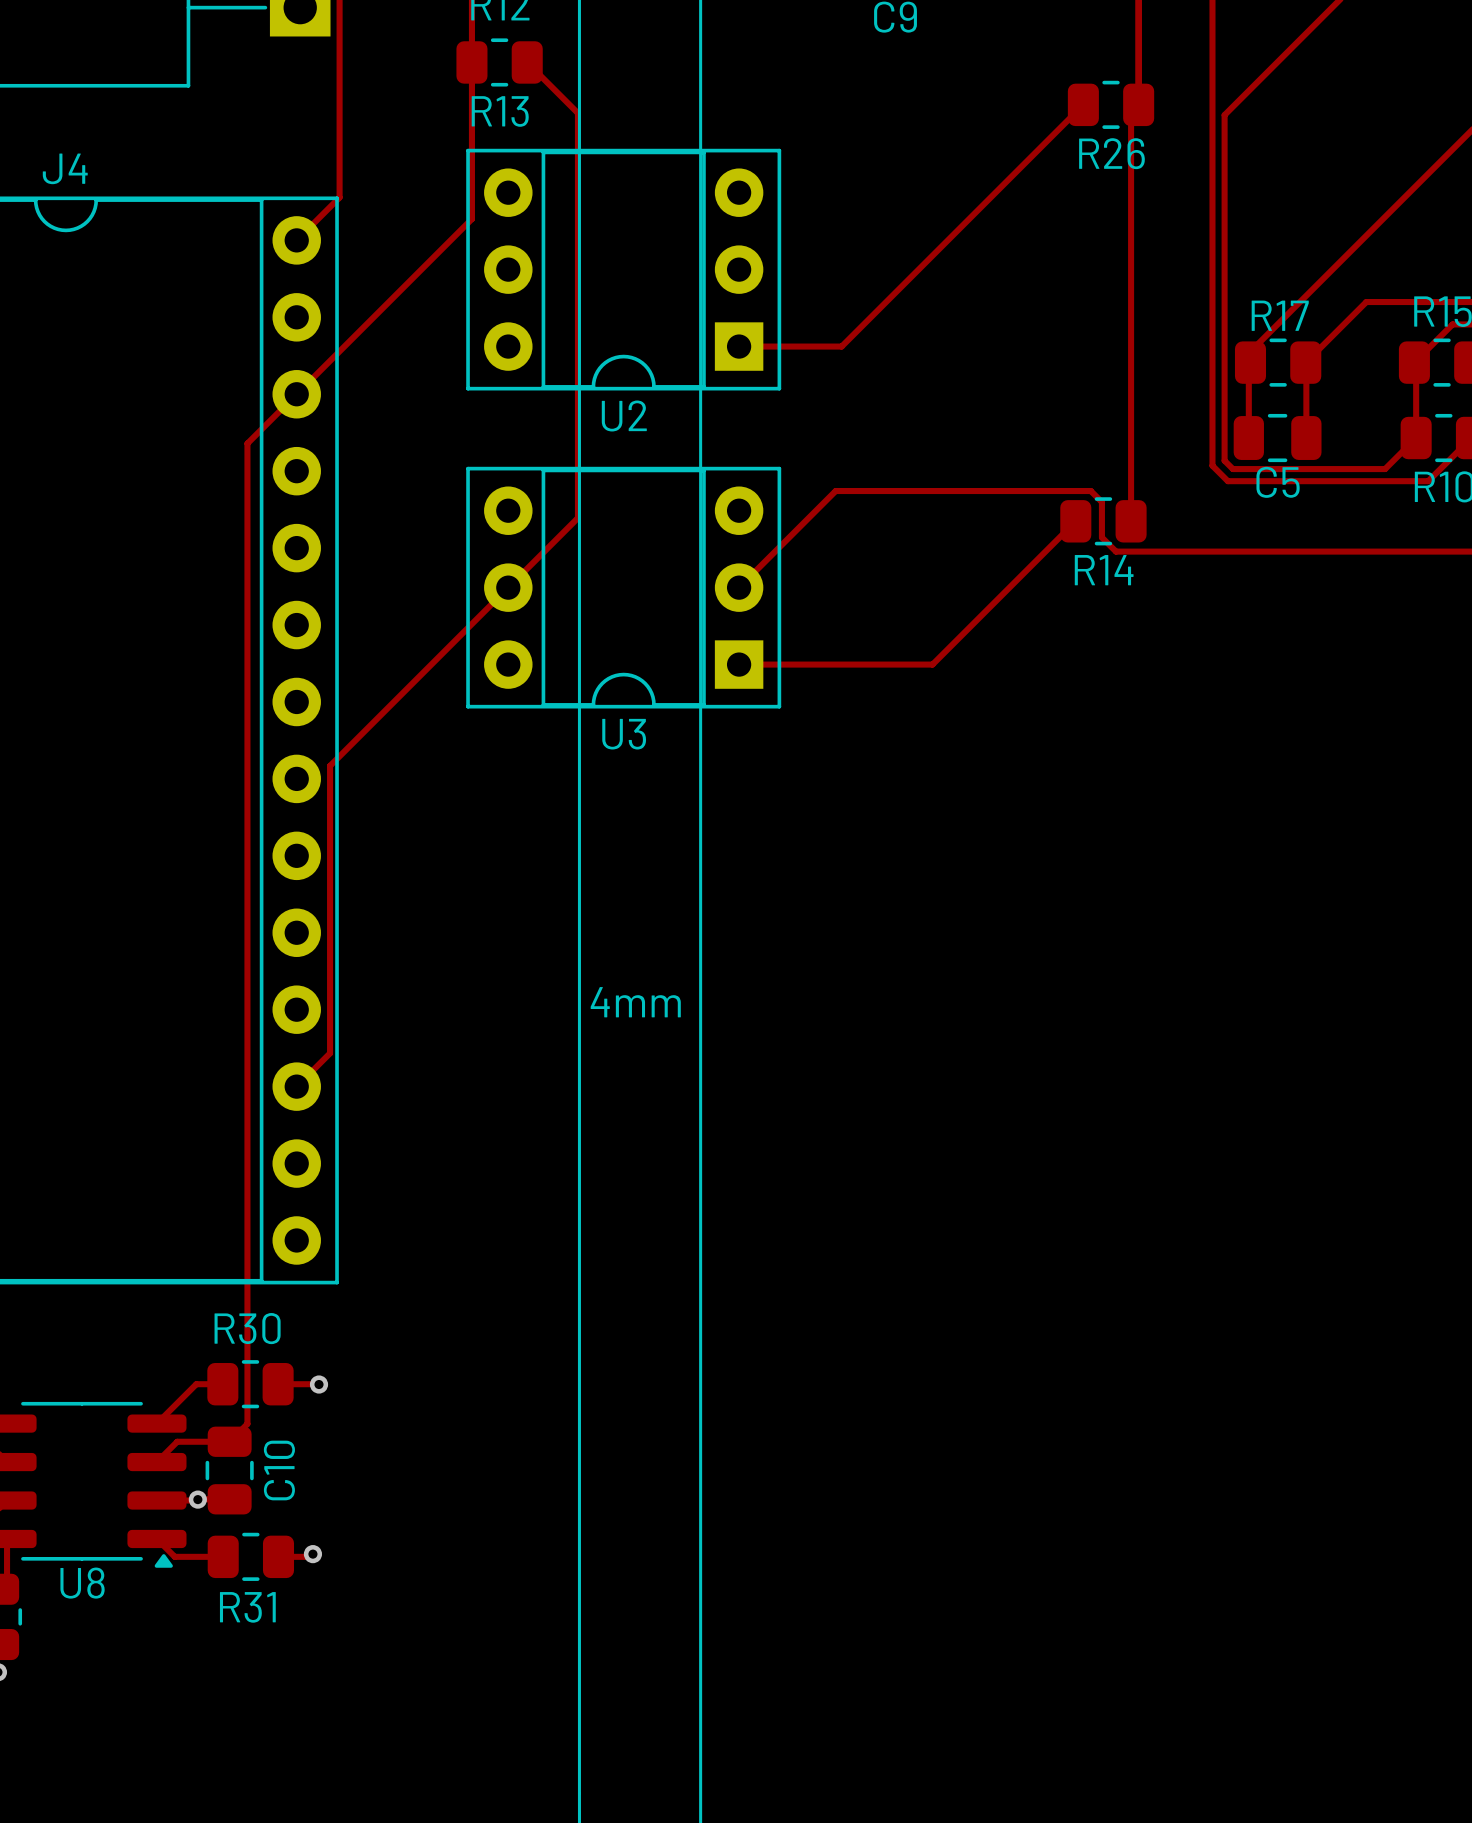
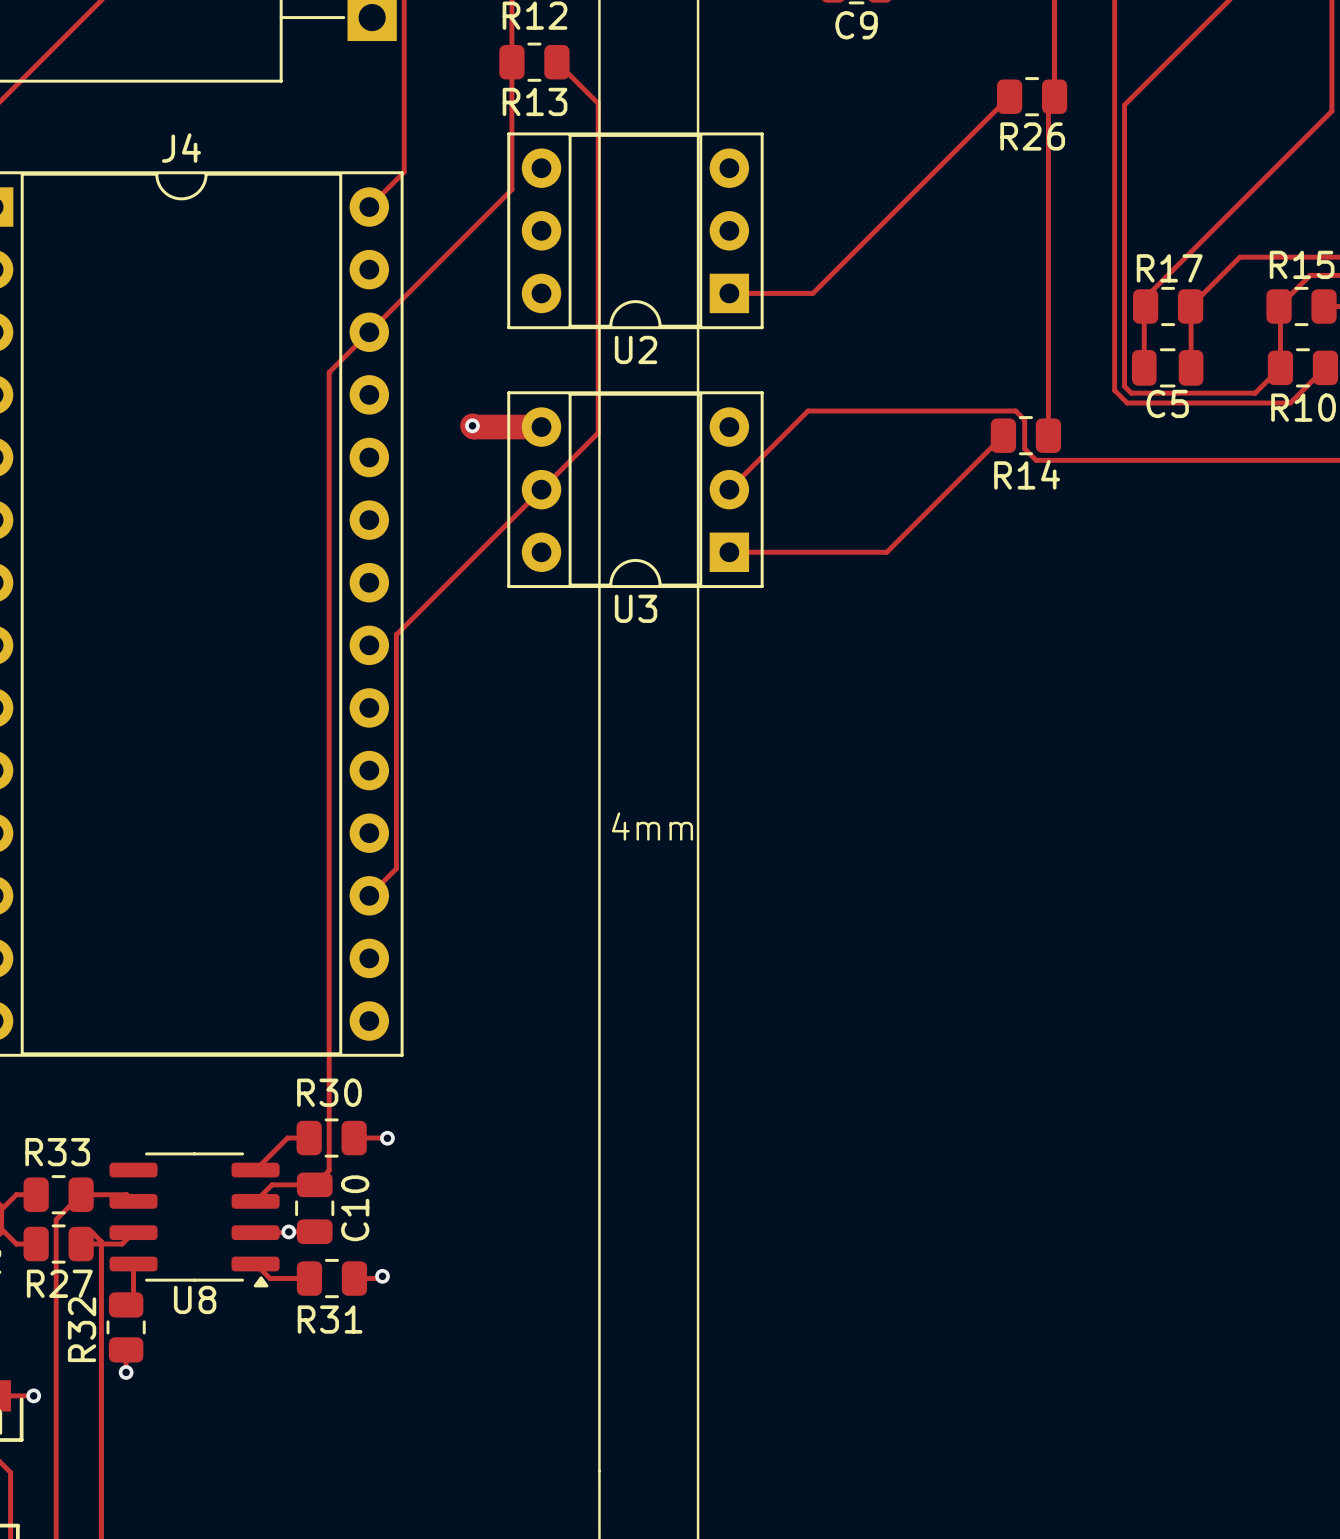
track: none -> (472, 425) (541, 427)
via: none -> (472, 425)

